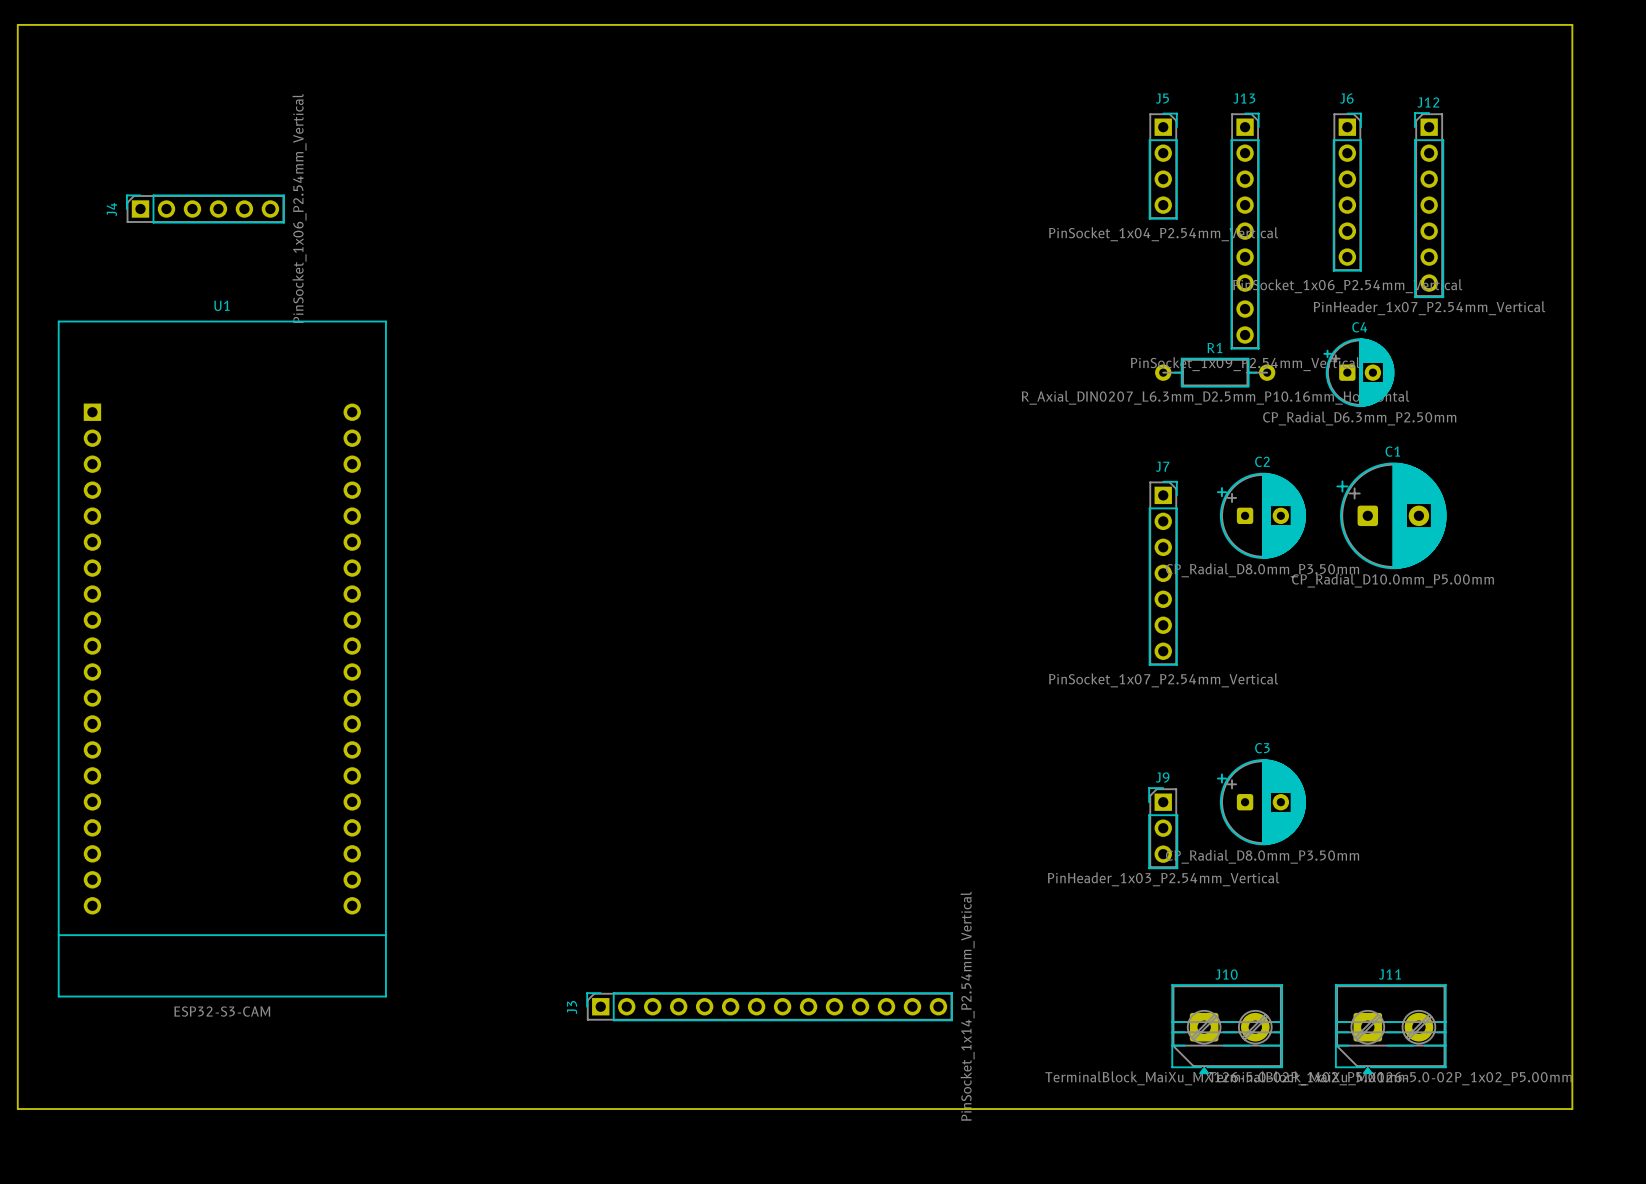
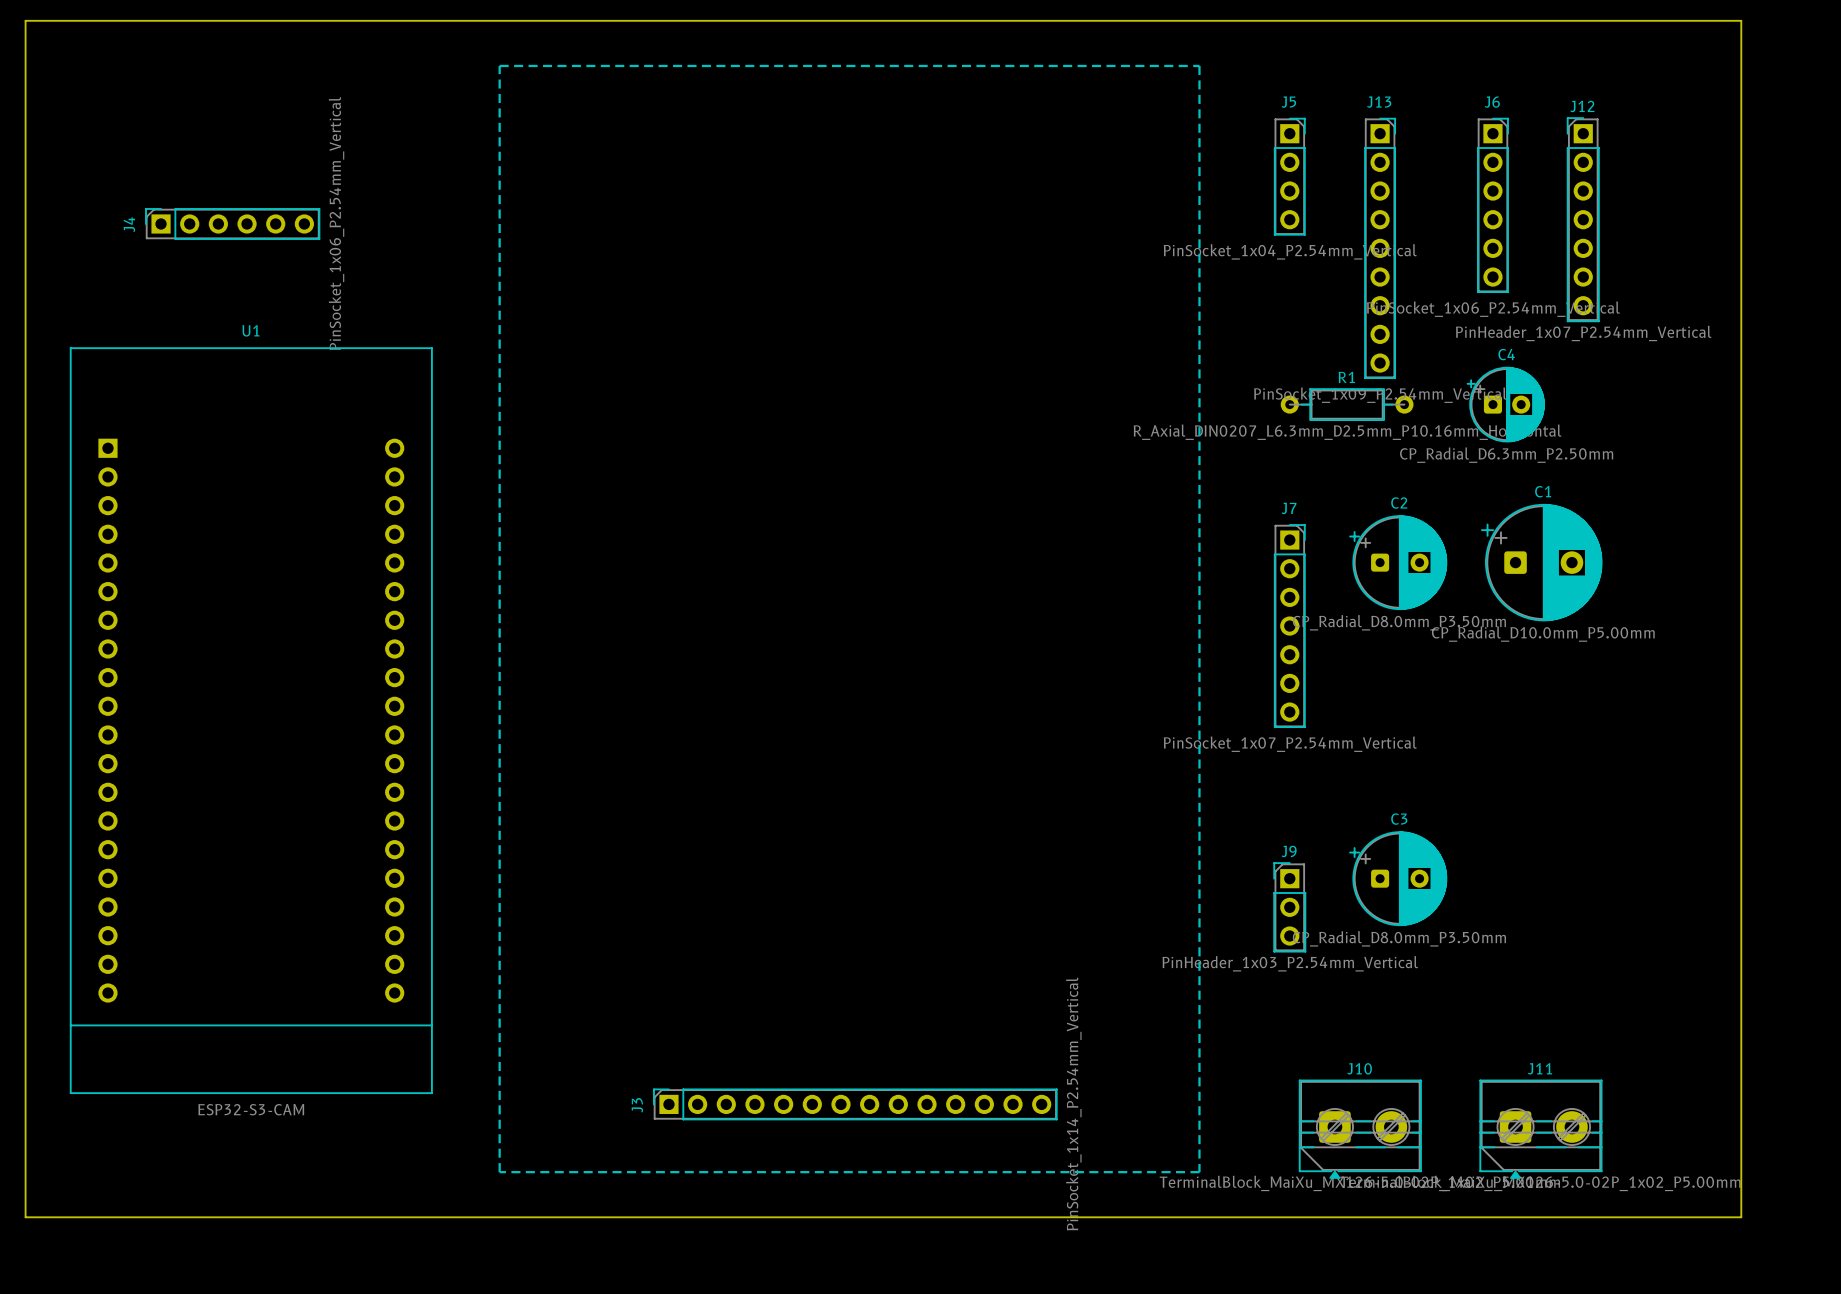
line: none -> (499, 65) (1199, 65) (1199, 1172) (499, 1172) (499, 65)

